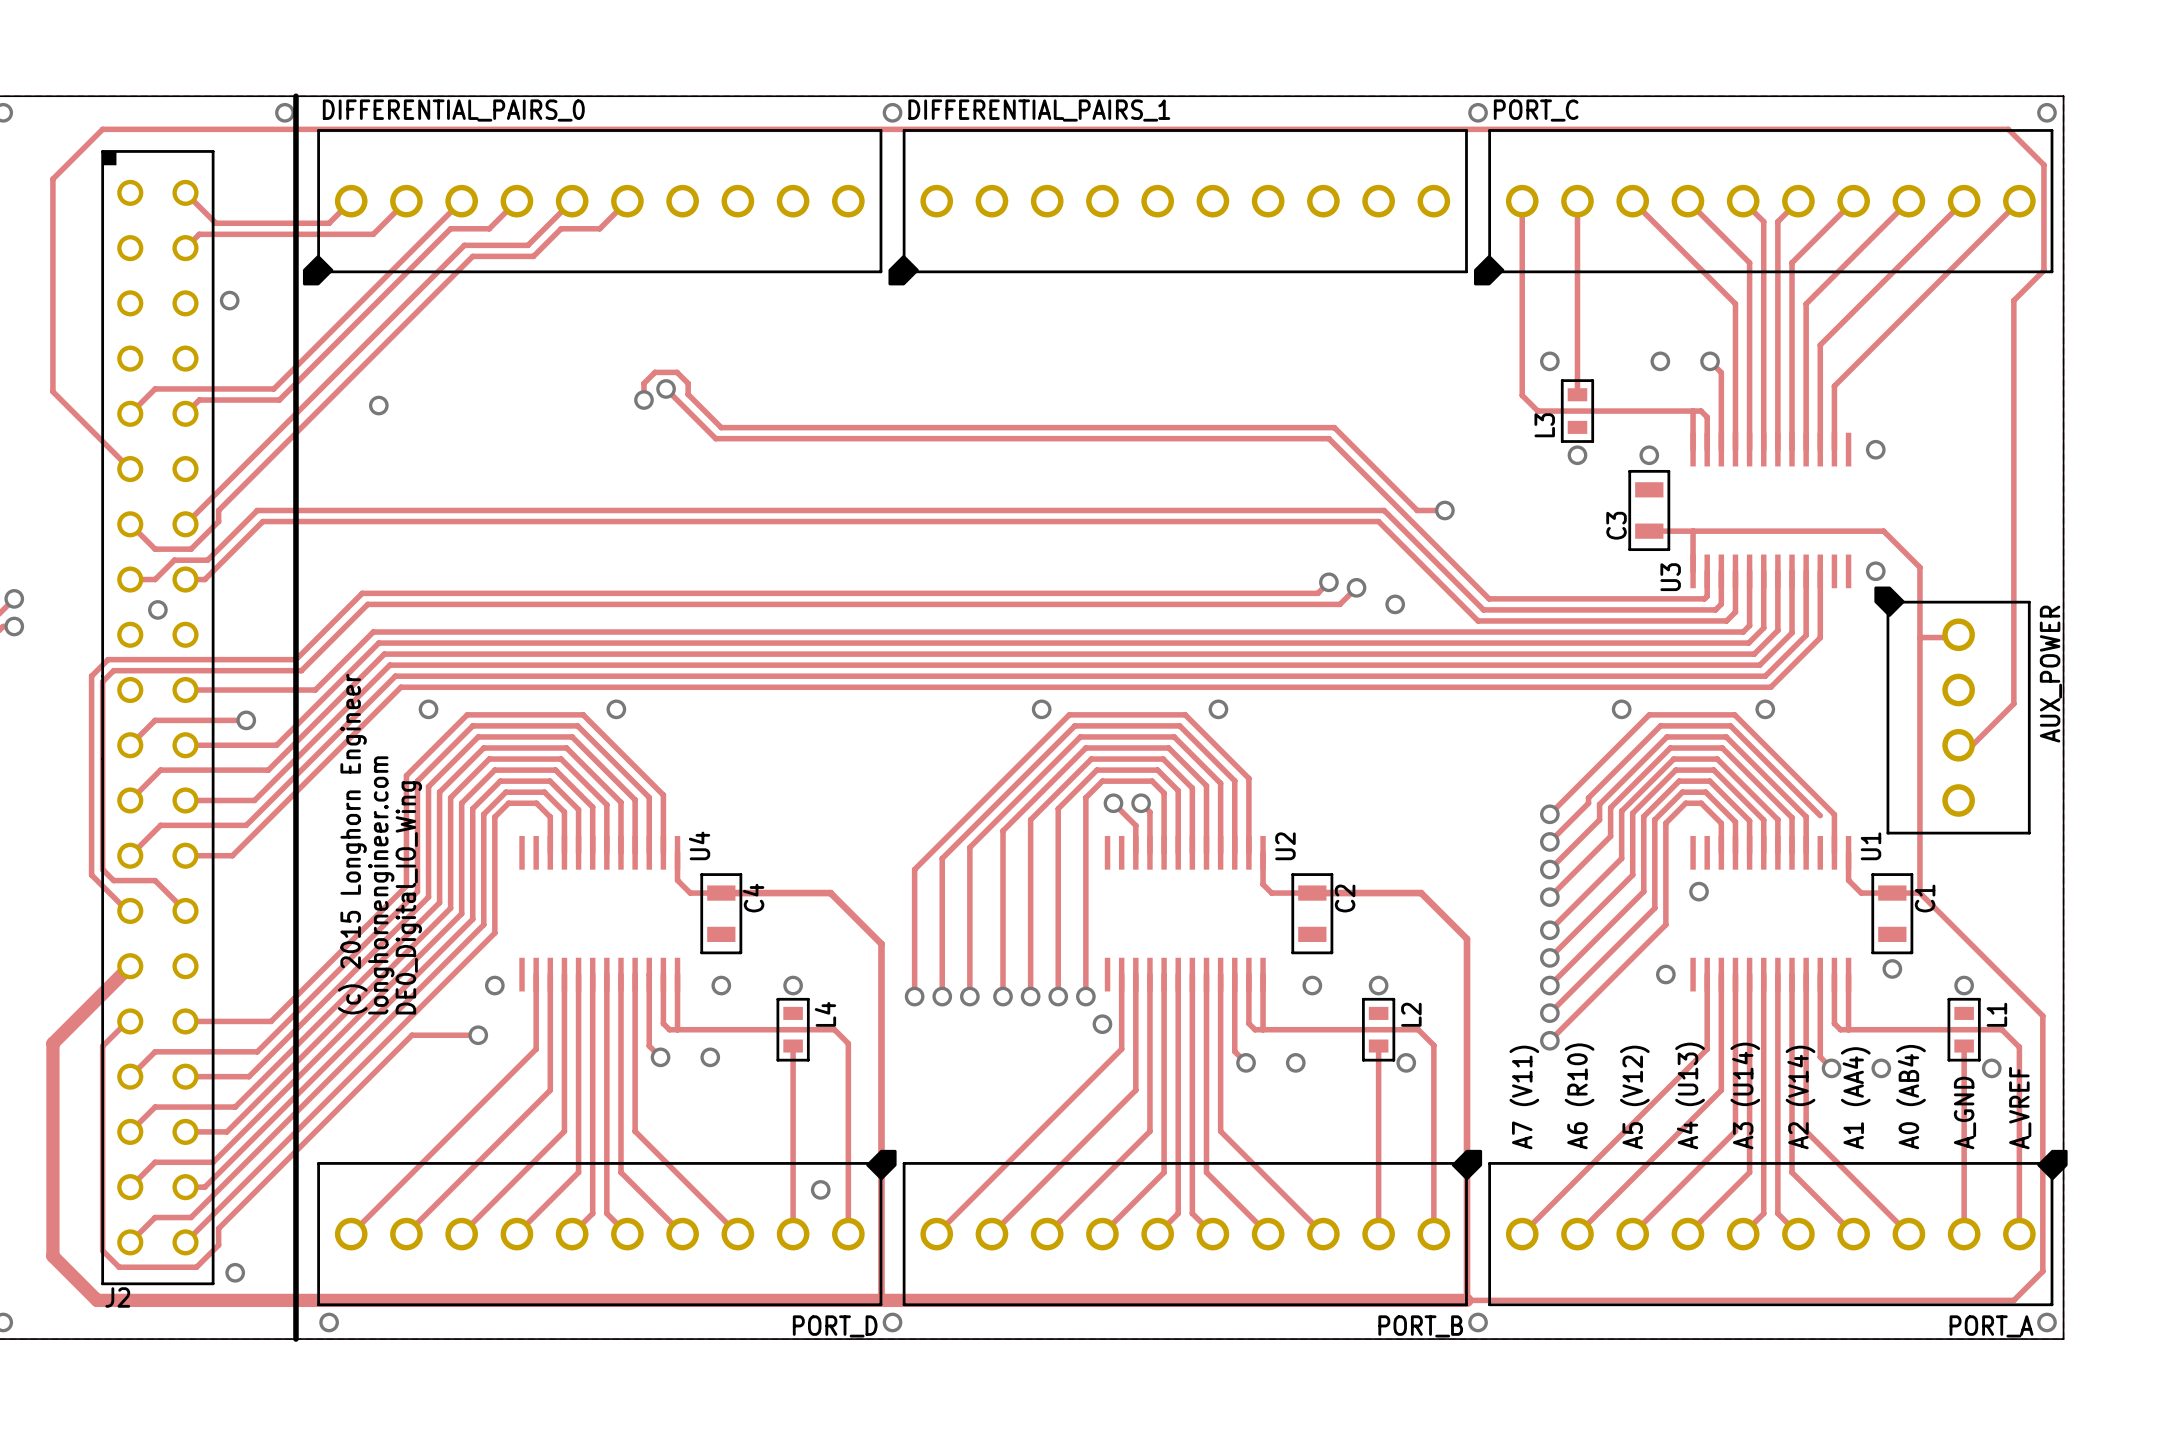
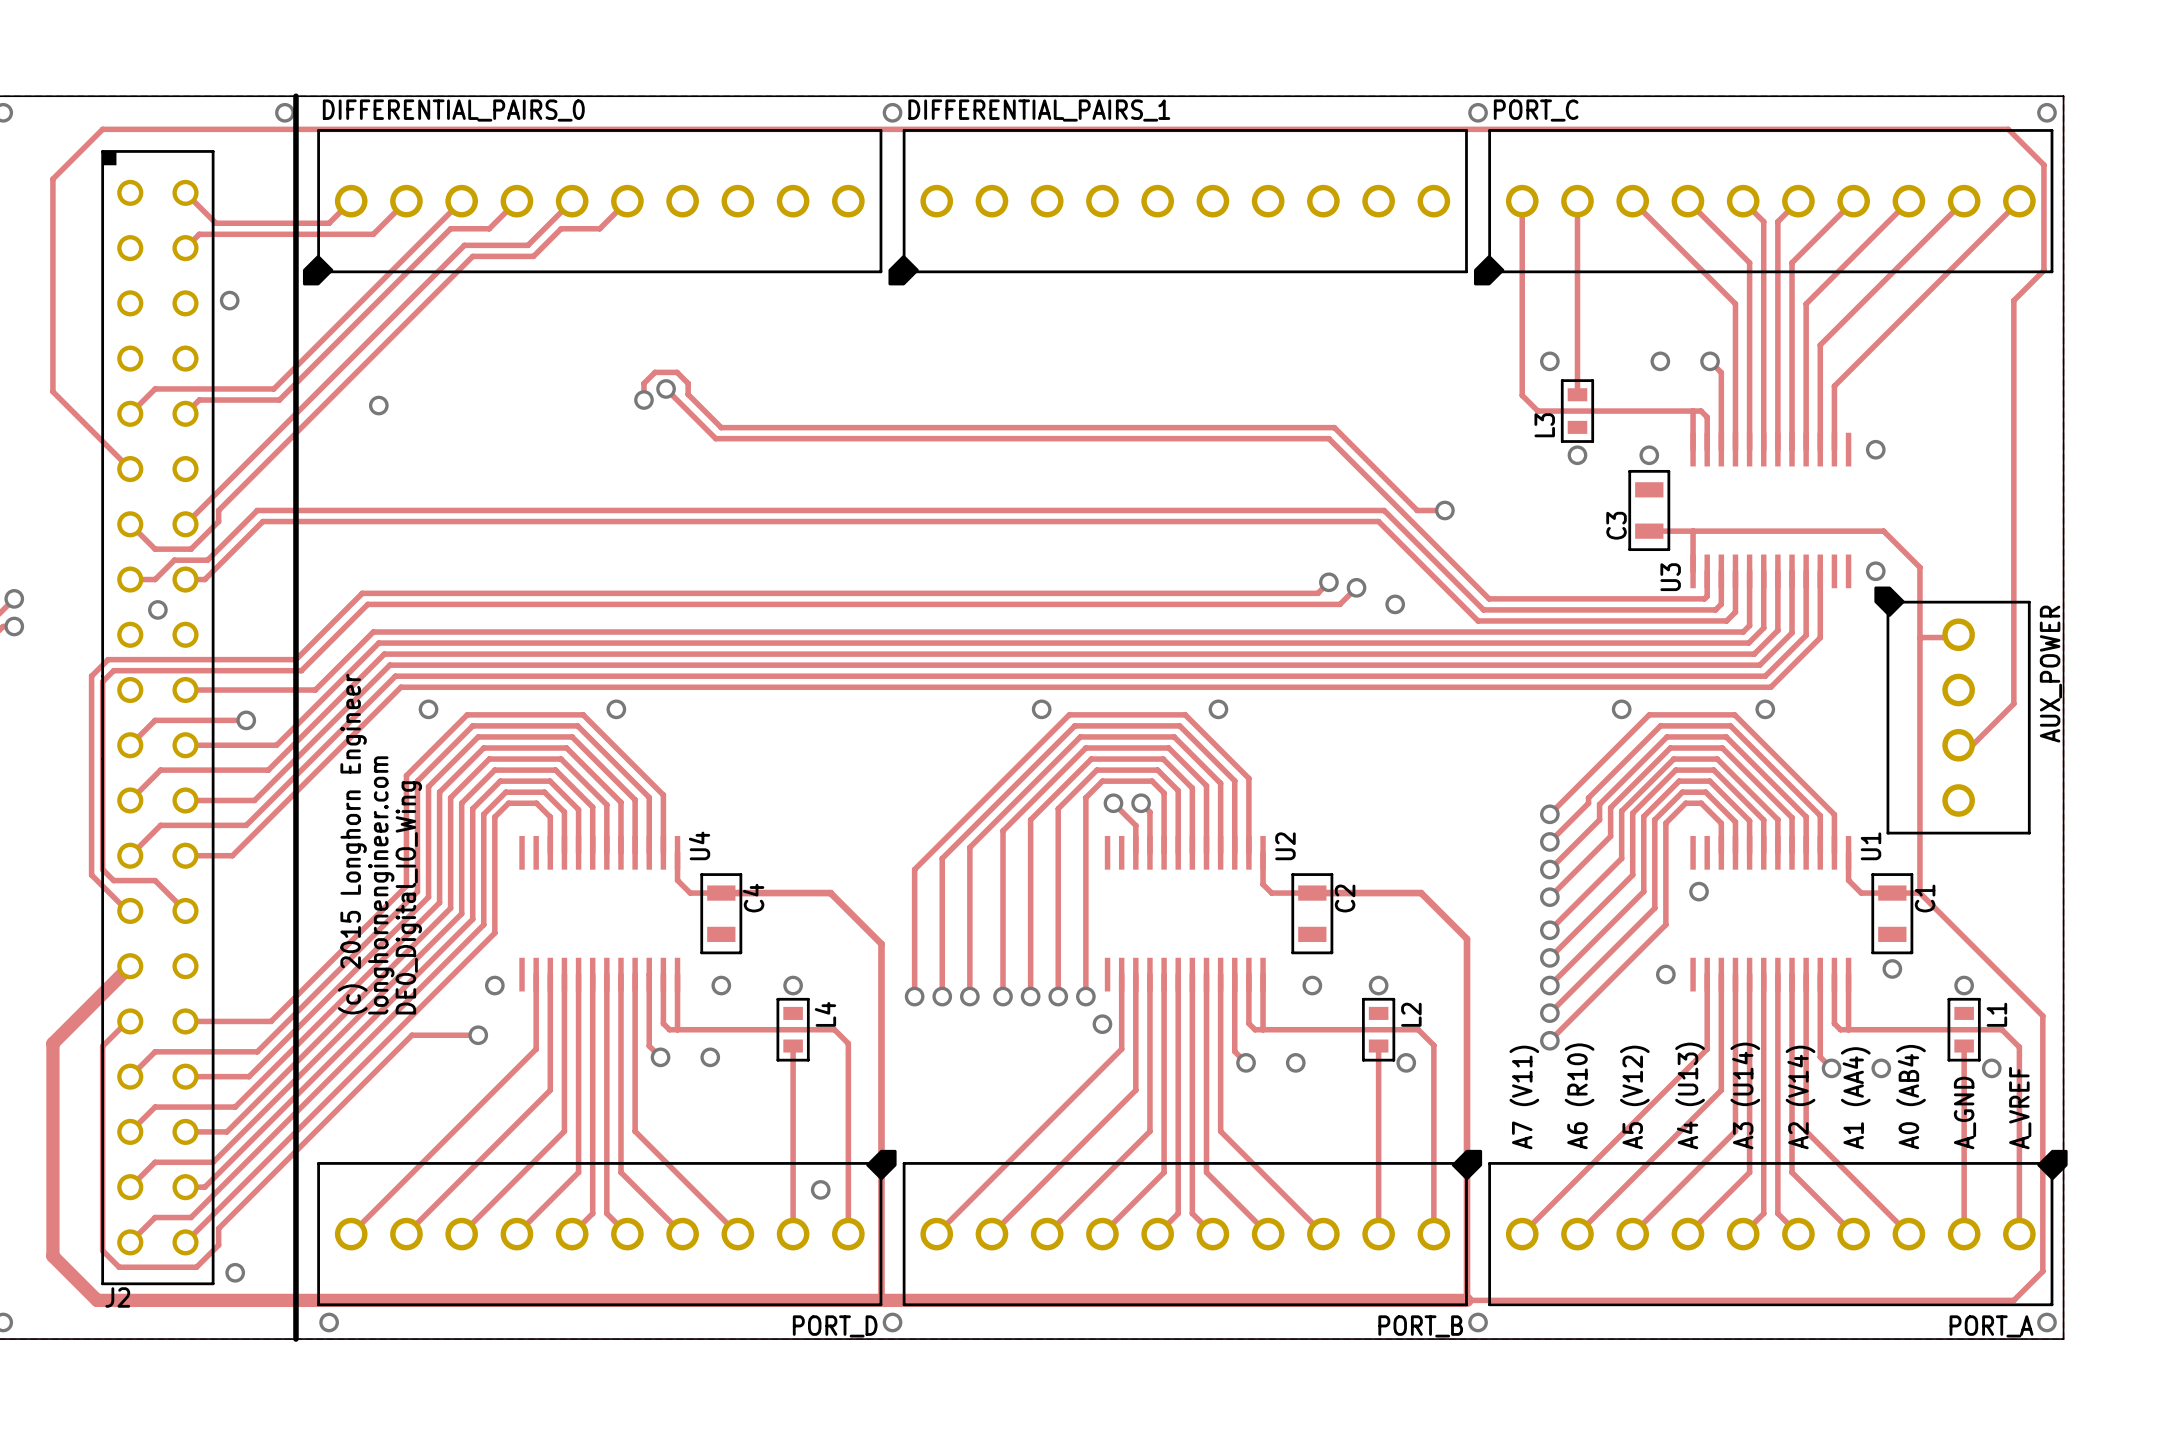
track: none -> (1820, 815) (1820, 852)

